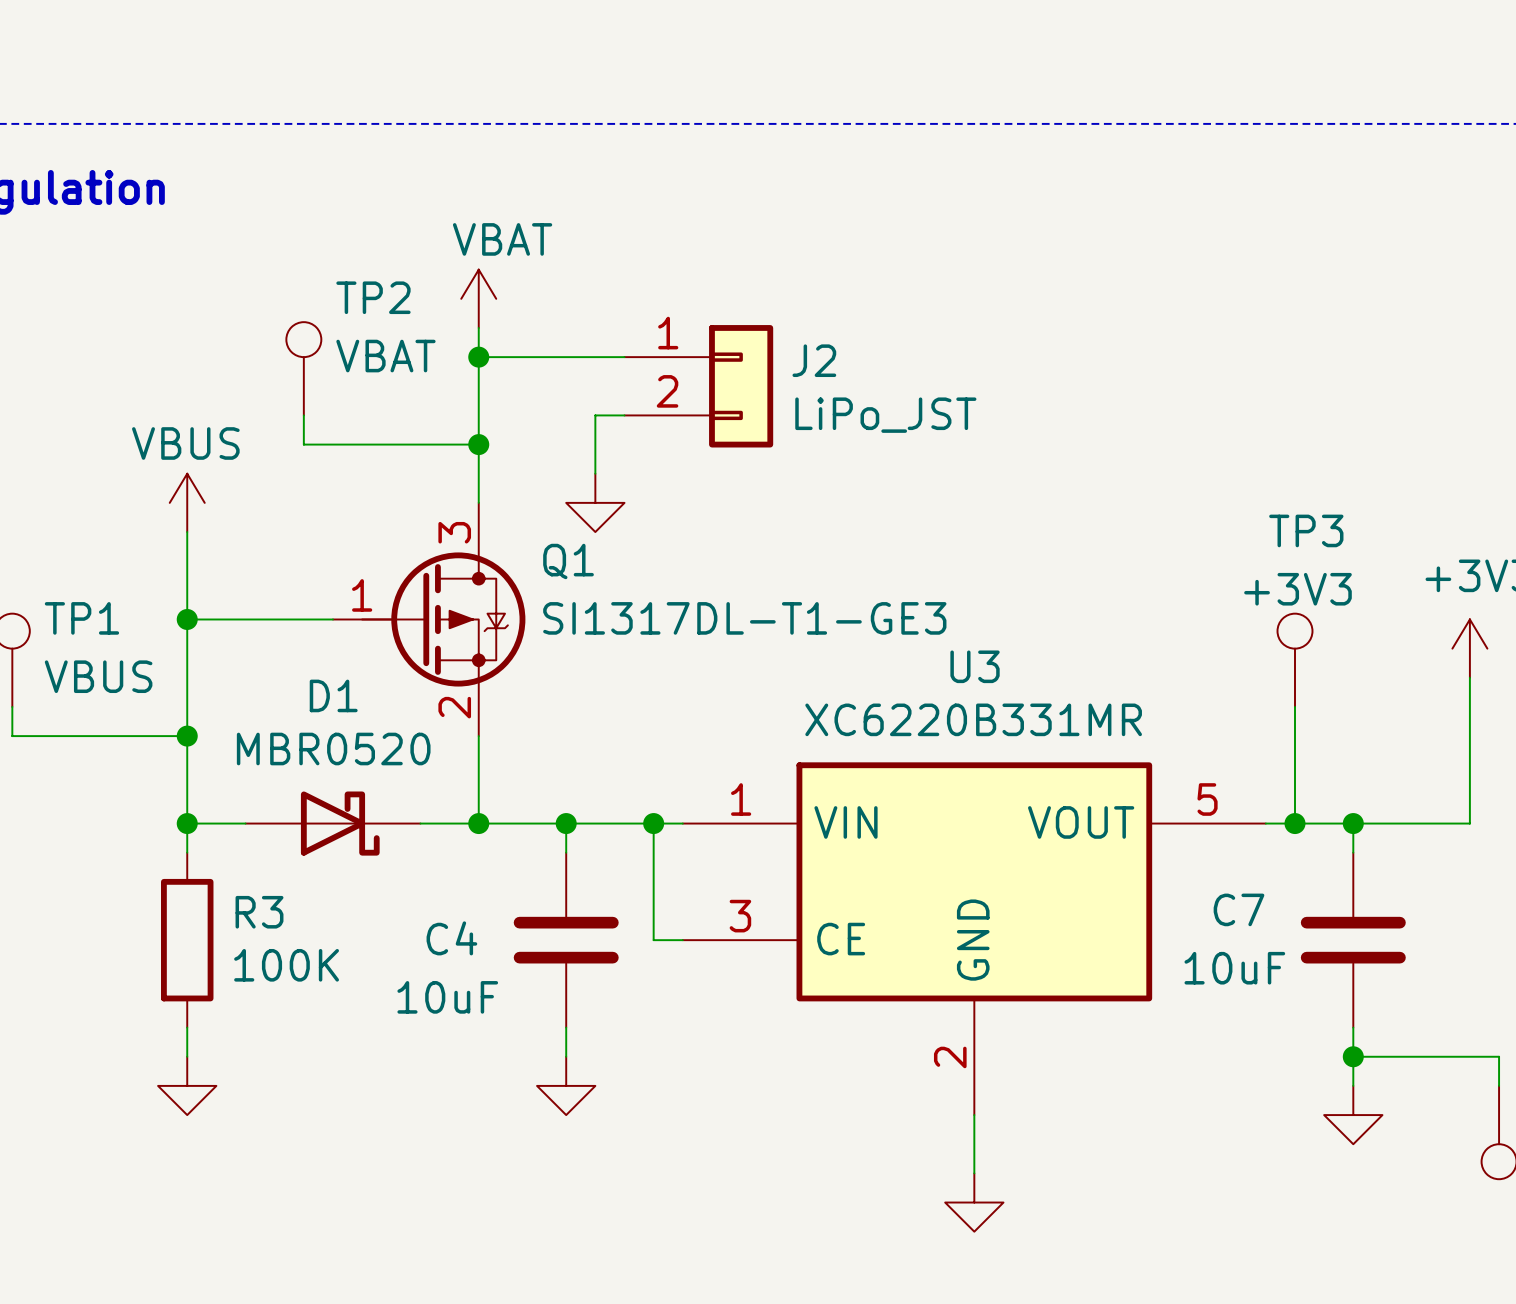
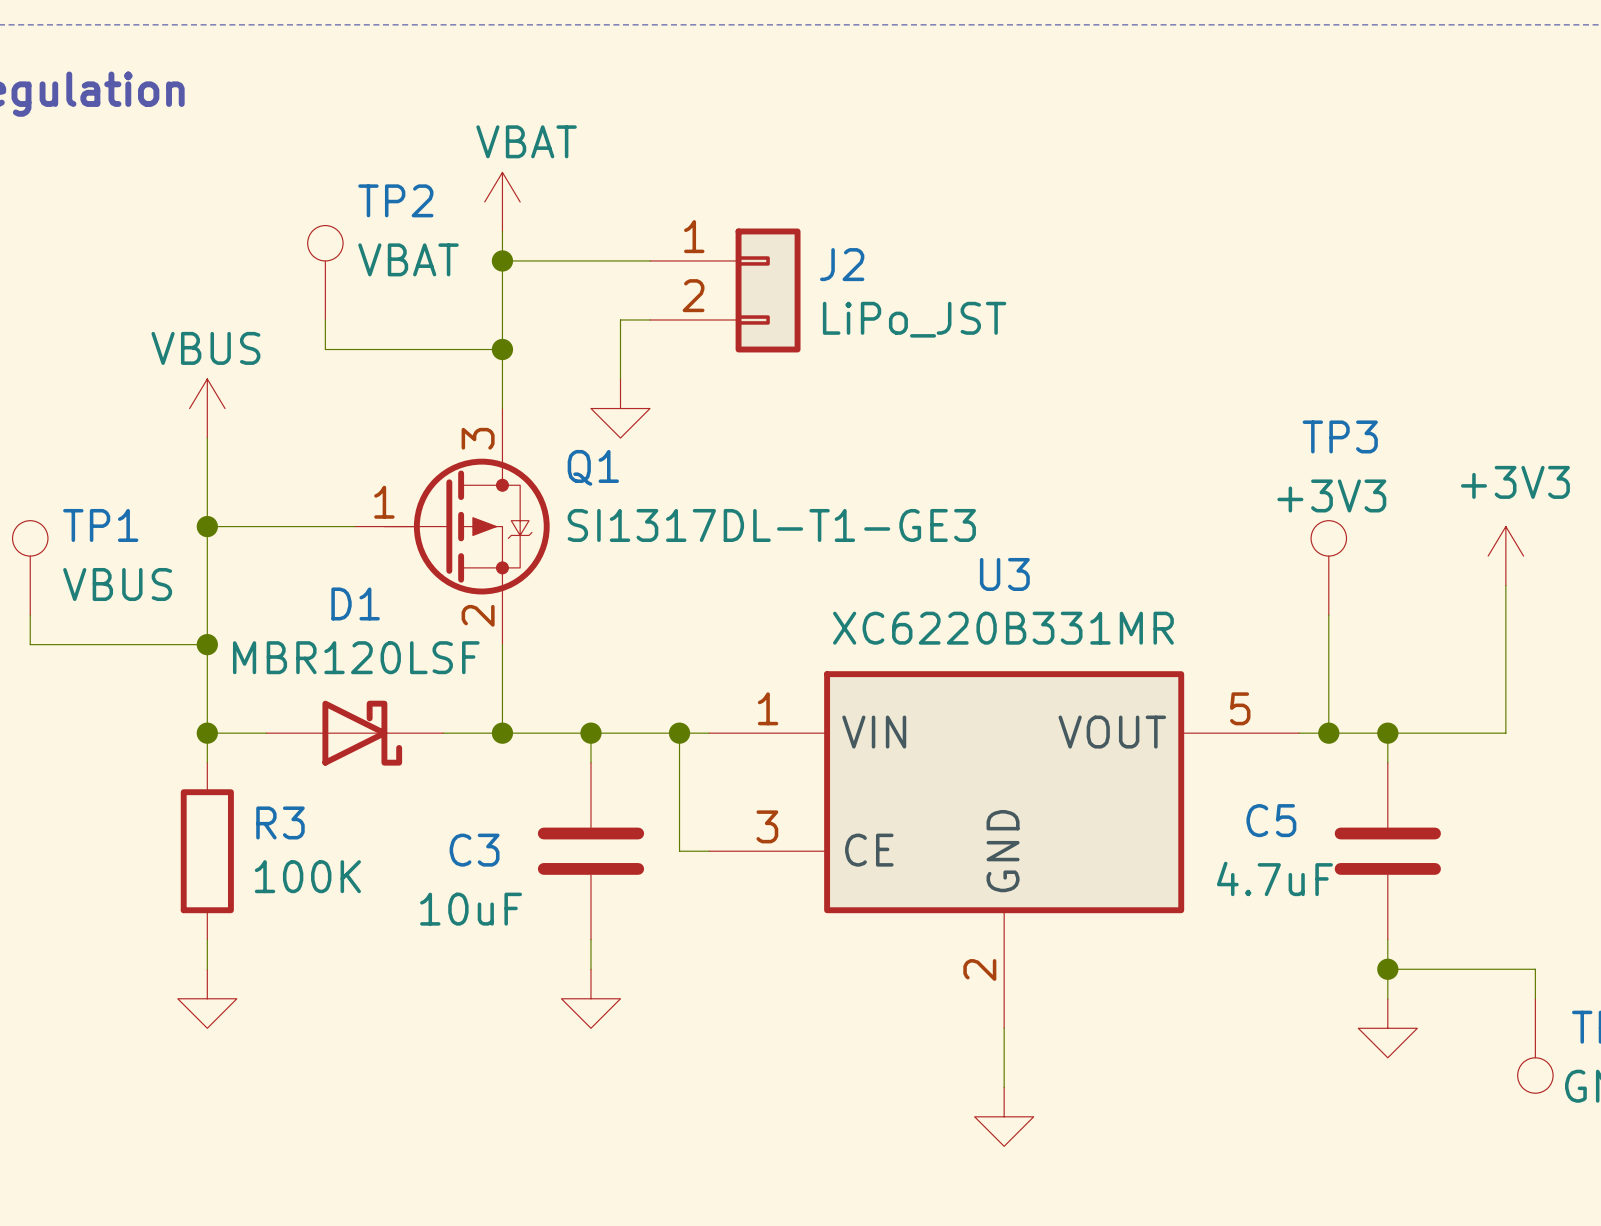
D1 value: MBR0520 (333, 749) -> MBR120LSF (356, 657)
C7 name: C7 (1239, 909) -> C5 (1271, 820)
C4 name: C4 (451, 938) -> C3 (474, 850)
C7 value: 10uF (1234, 968) -> 4.7uF (1274, 878)

